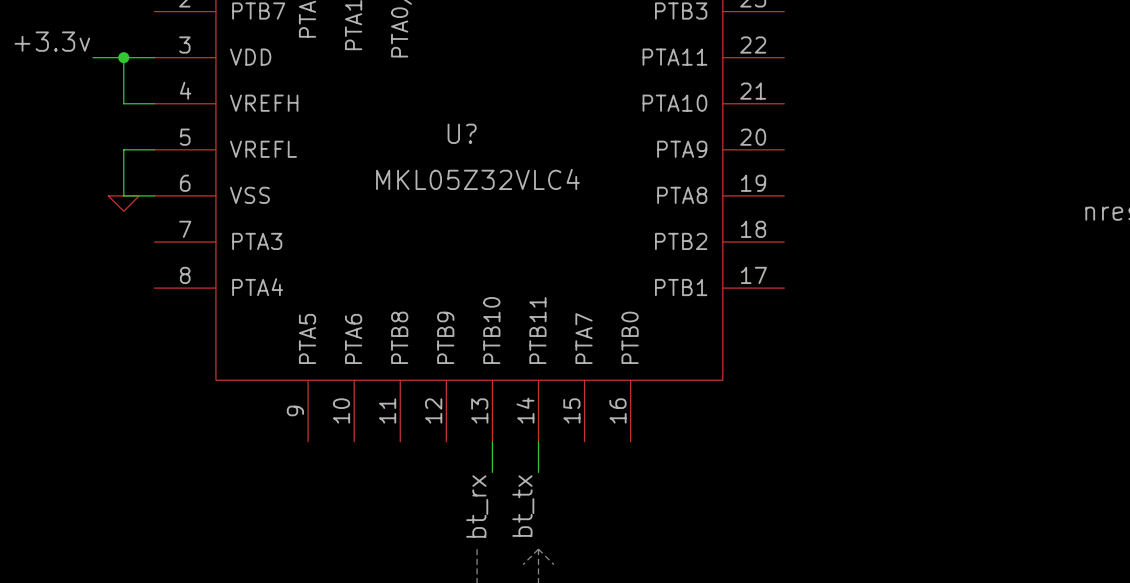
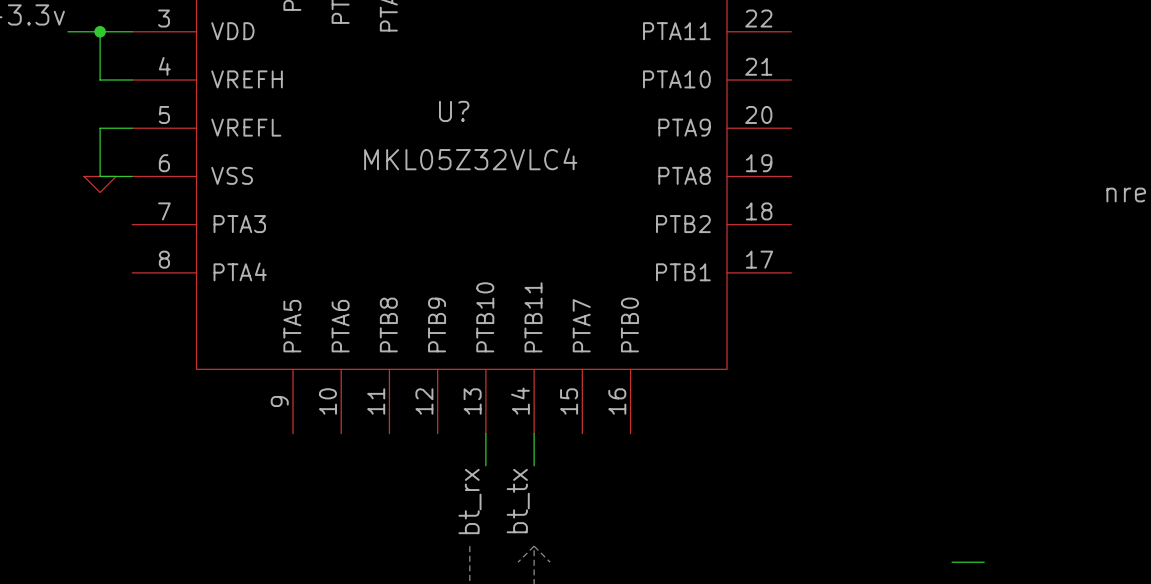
wire: none -> (952, 562) (984, 562)

